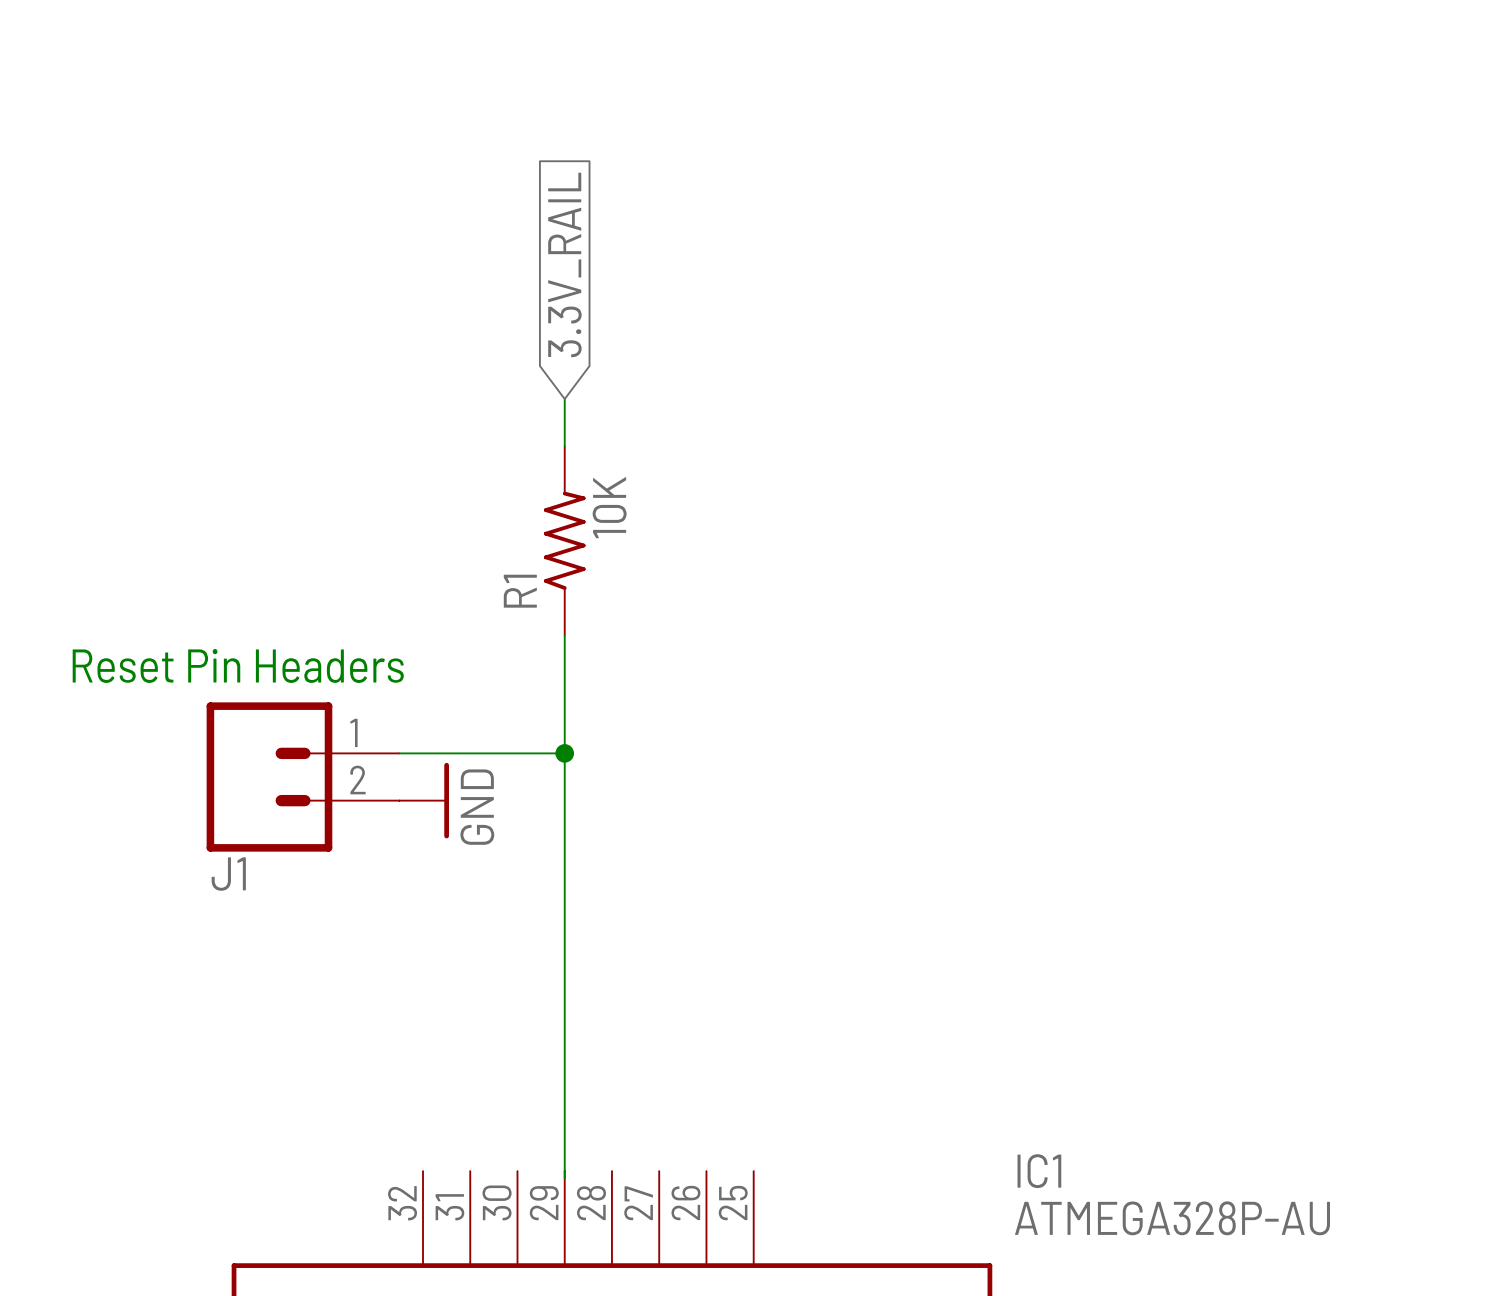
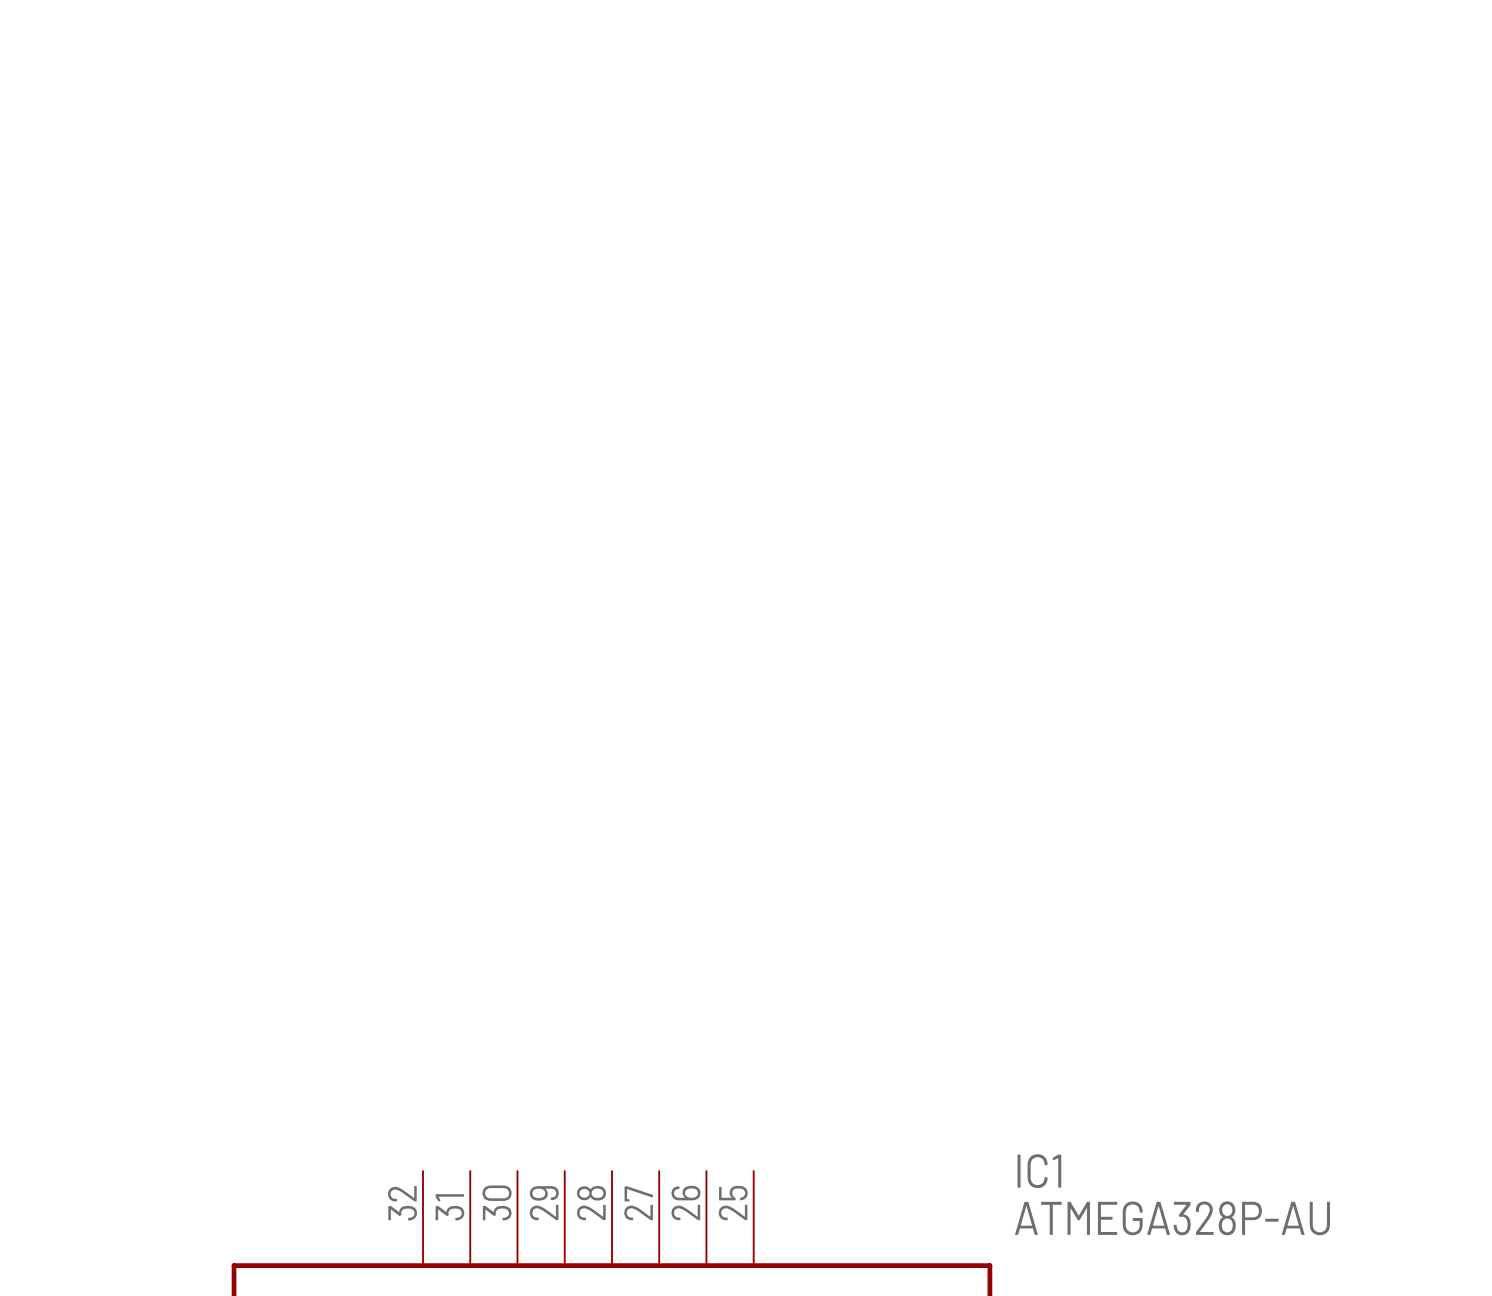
global label: 3.3V_RAIL (564, 264) -> none
wire: (564, 399) (564, 446) -> none
R1: 10K (564, 540) -> none
wire: (564, 635) (564, 1178) -> none
text: Reset Pin Headers (238, 665) -> none
wire: (399, 753) (564, 753) -> none
junction: (564, 753) -> none
J1: (303, 777) -> none
power symbol: GND (424, 800) -> none

